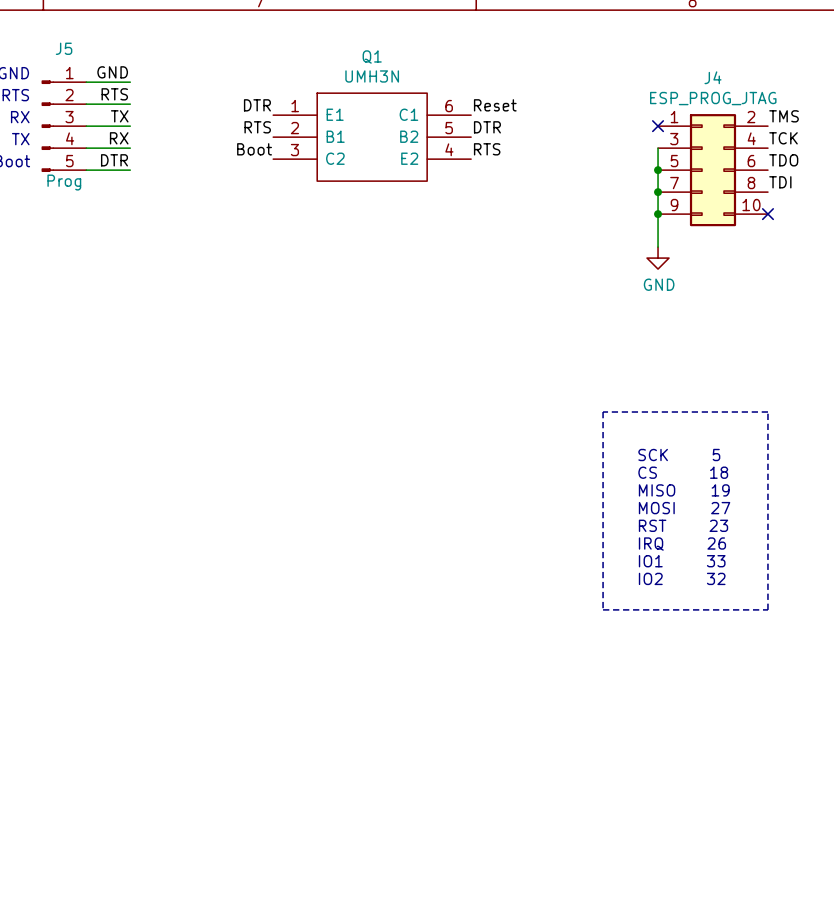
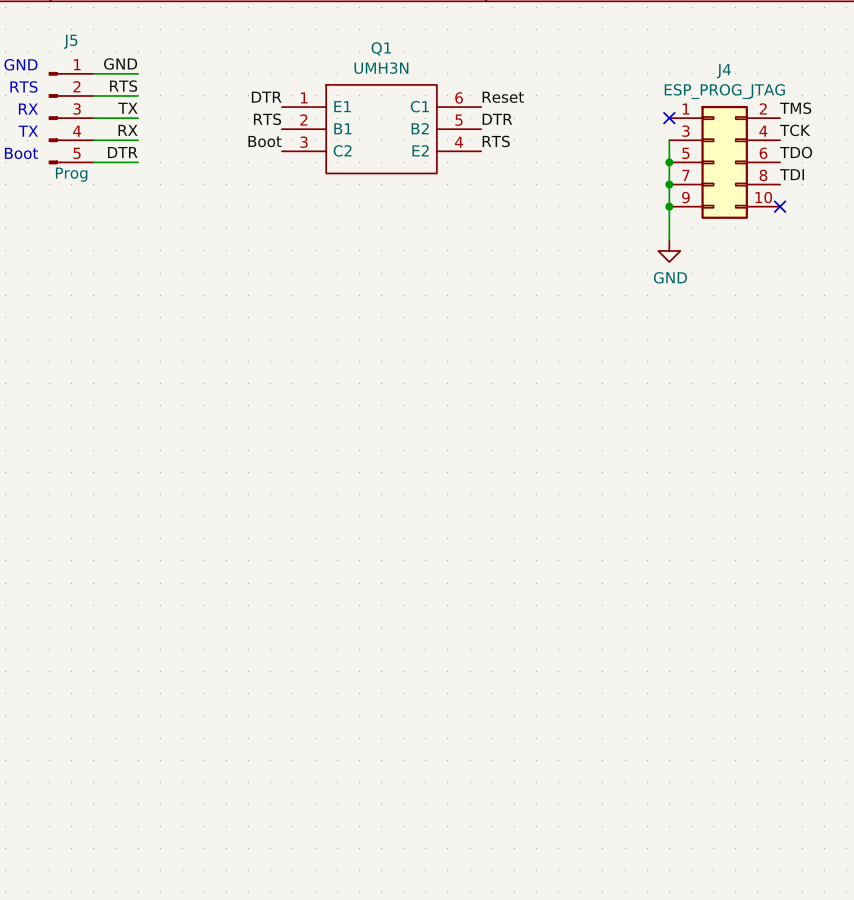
line: (603, 412) (603, 609) (767, 609) (767, 412) (603, 412) -> none
text: SCK 5 (679, 455) -> none
text: CS 18 (683, 472) -> none
text: MISO 19 (684, 490) -> none
text: MOSI 27 (684, 508) -> none
text: RST 23 (683, 525) -> none
text: IRQ 26 (682, 544) -> none
text: IO1 33 (682, 561) -> none
text: IO2 32 (682, 578) -> none

